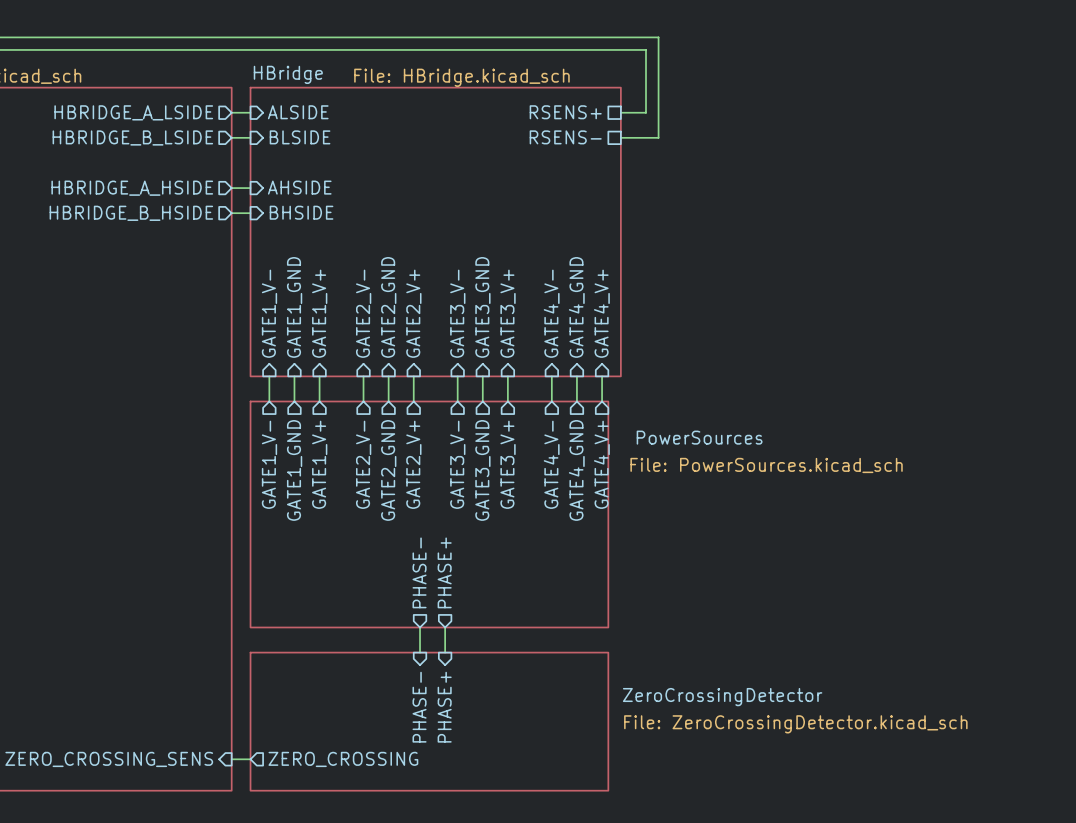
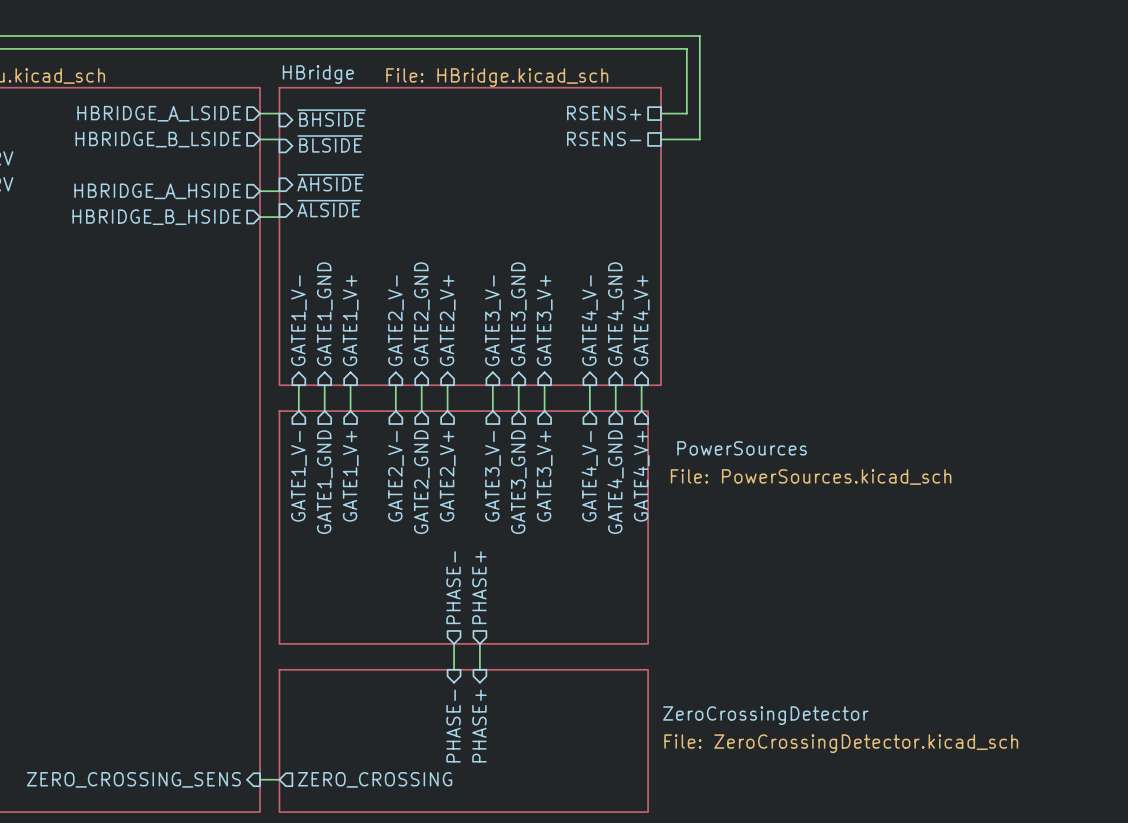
sheet pin: ALSIDE (298, 112) -> ~{BHSIDE} (331, 118)
sheet pin: BLSIDE (300, 137) -> ~{BLSIDE} (330, 143)
sheet pin: AHSIDE (299, 187) -> ~{AHSIDE} (330, 182)
sheet pin: BHSIDE (301, 212) -> ~{ALSIDE} (329, 208)

